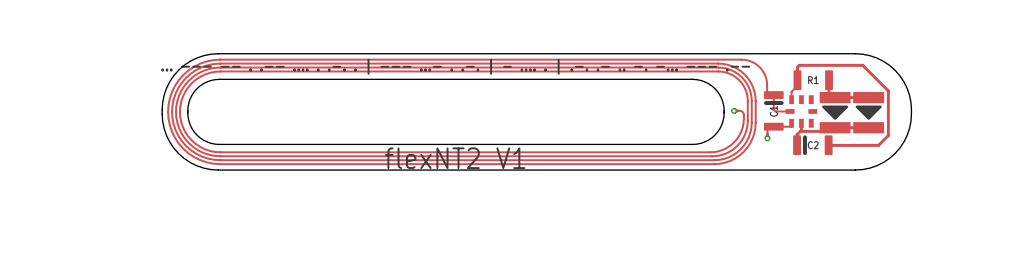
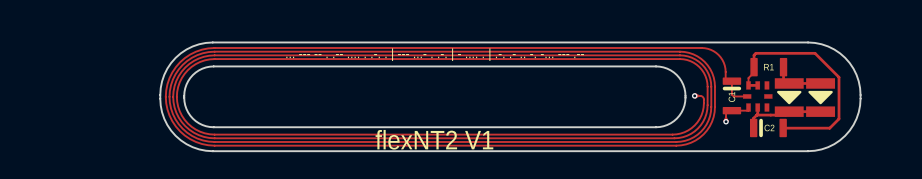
track: none -> (748, 85) (757, 85)

